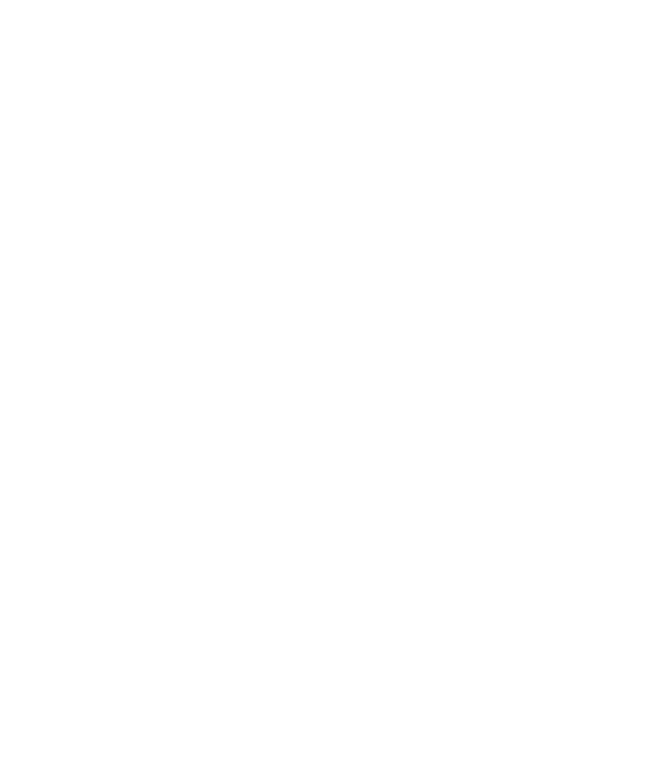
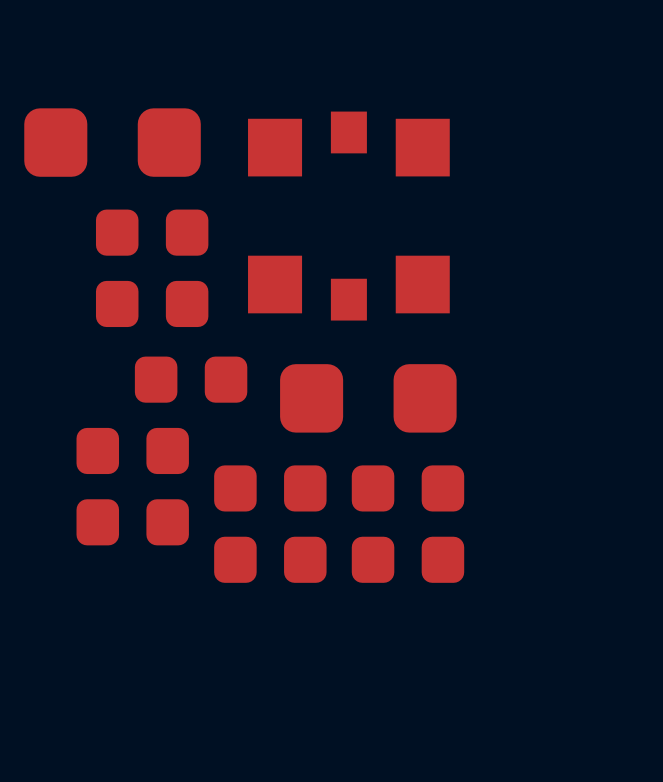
part: none -> (112, 142)
part: none -> (348, 216)
part: none -> (152, 232)
part: none -> (152, 303)
part: none -> (191, 379)
part: none -> (368, 398)
part: none -> (132, 450)
part: none -> (270, 488)
part: none -> (407, 488)
part: none -> (132, 522)
part: none -> (270, 559)
part: none -> (407, 559)

